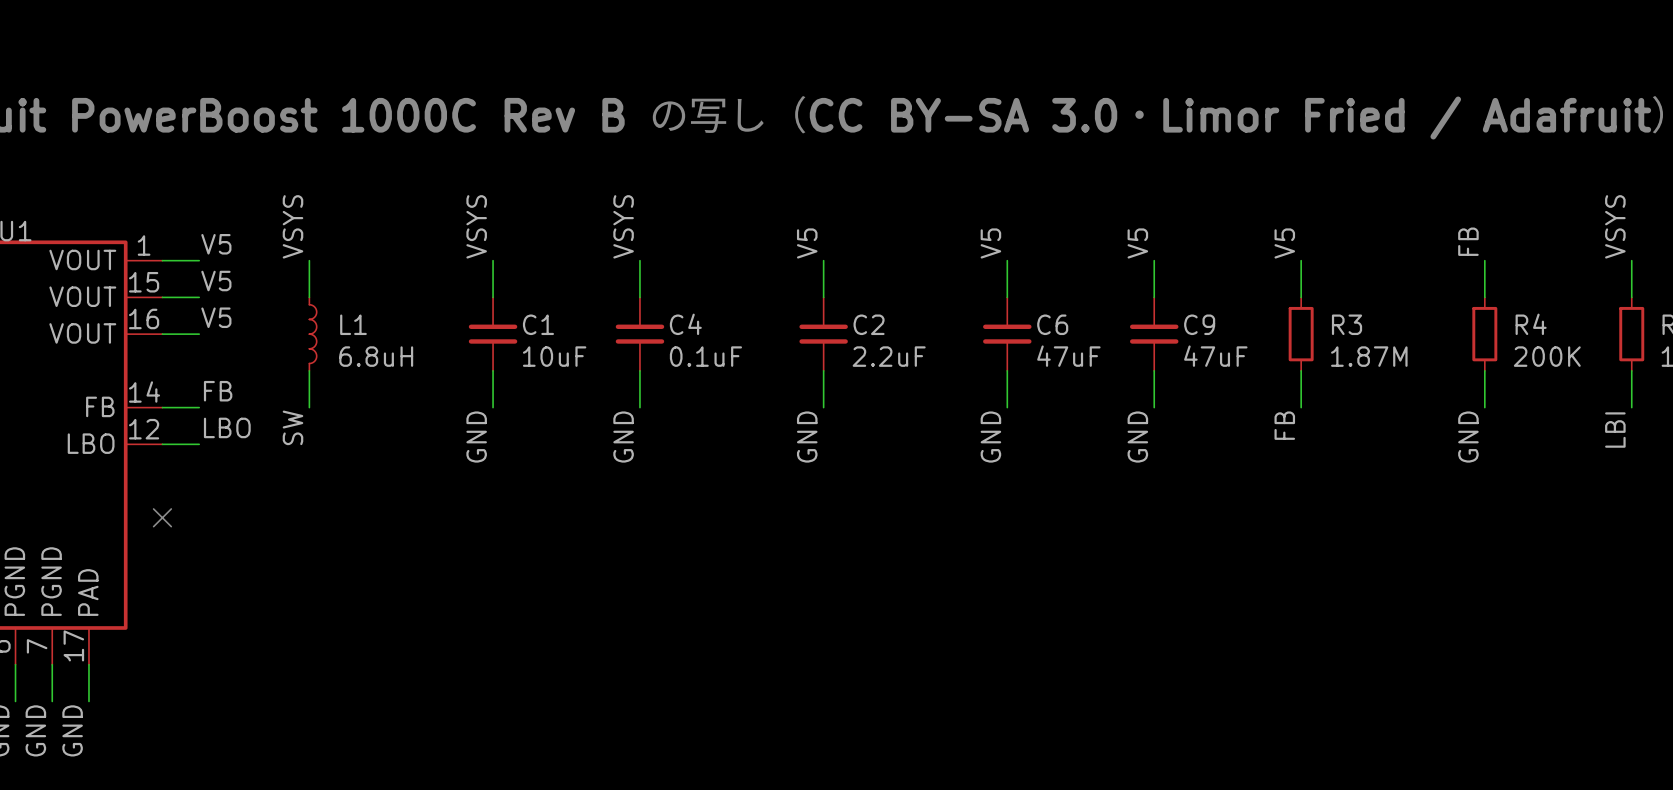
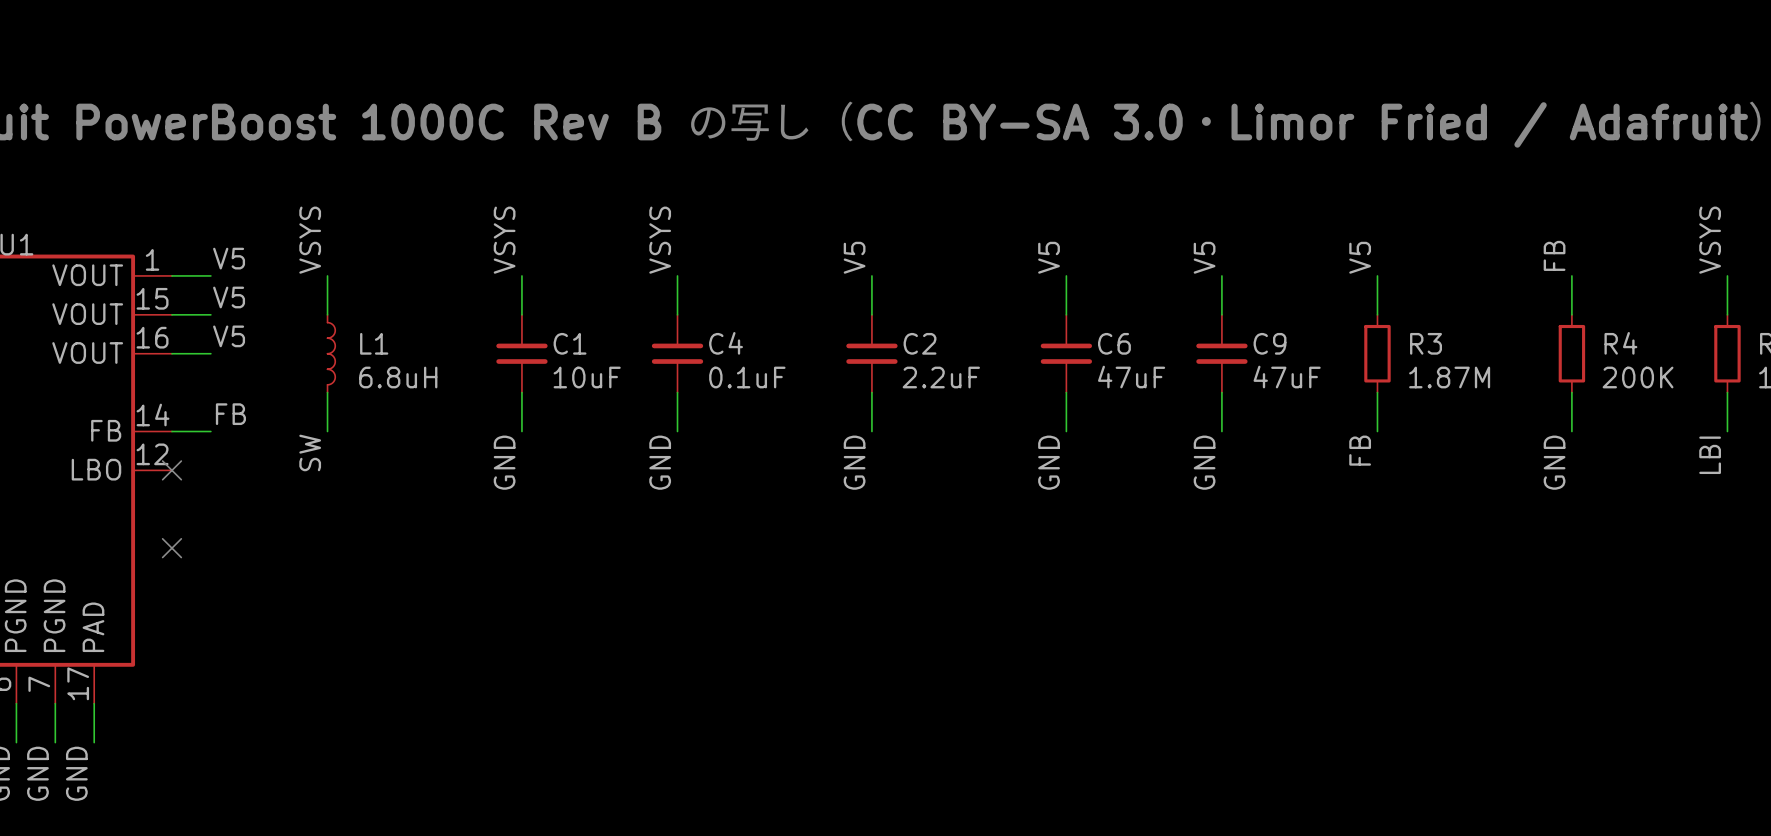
label: LBO (227, 427) -> none
wire: (162, 444) (199, 444) -> none
no-connect mark: none -> (171, 470)

